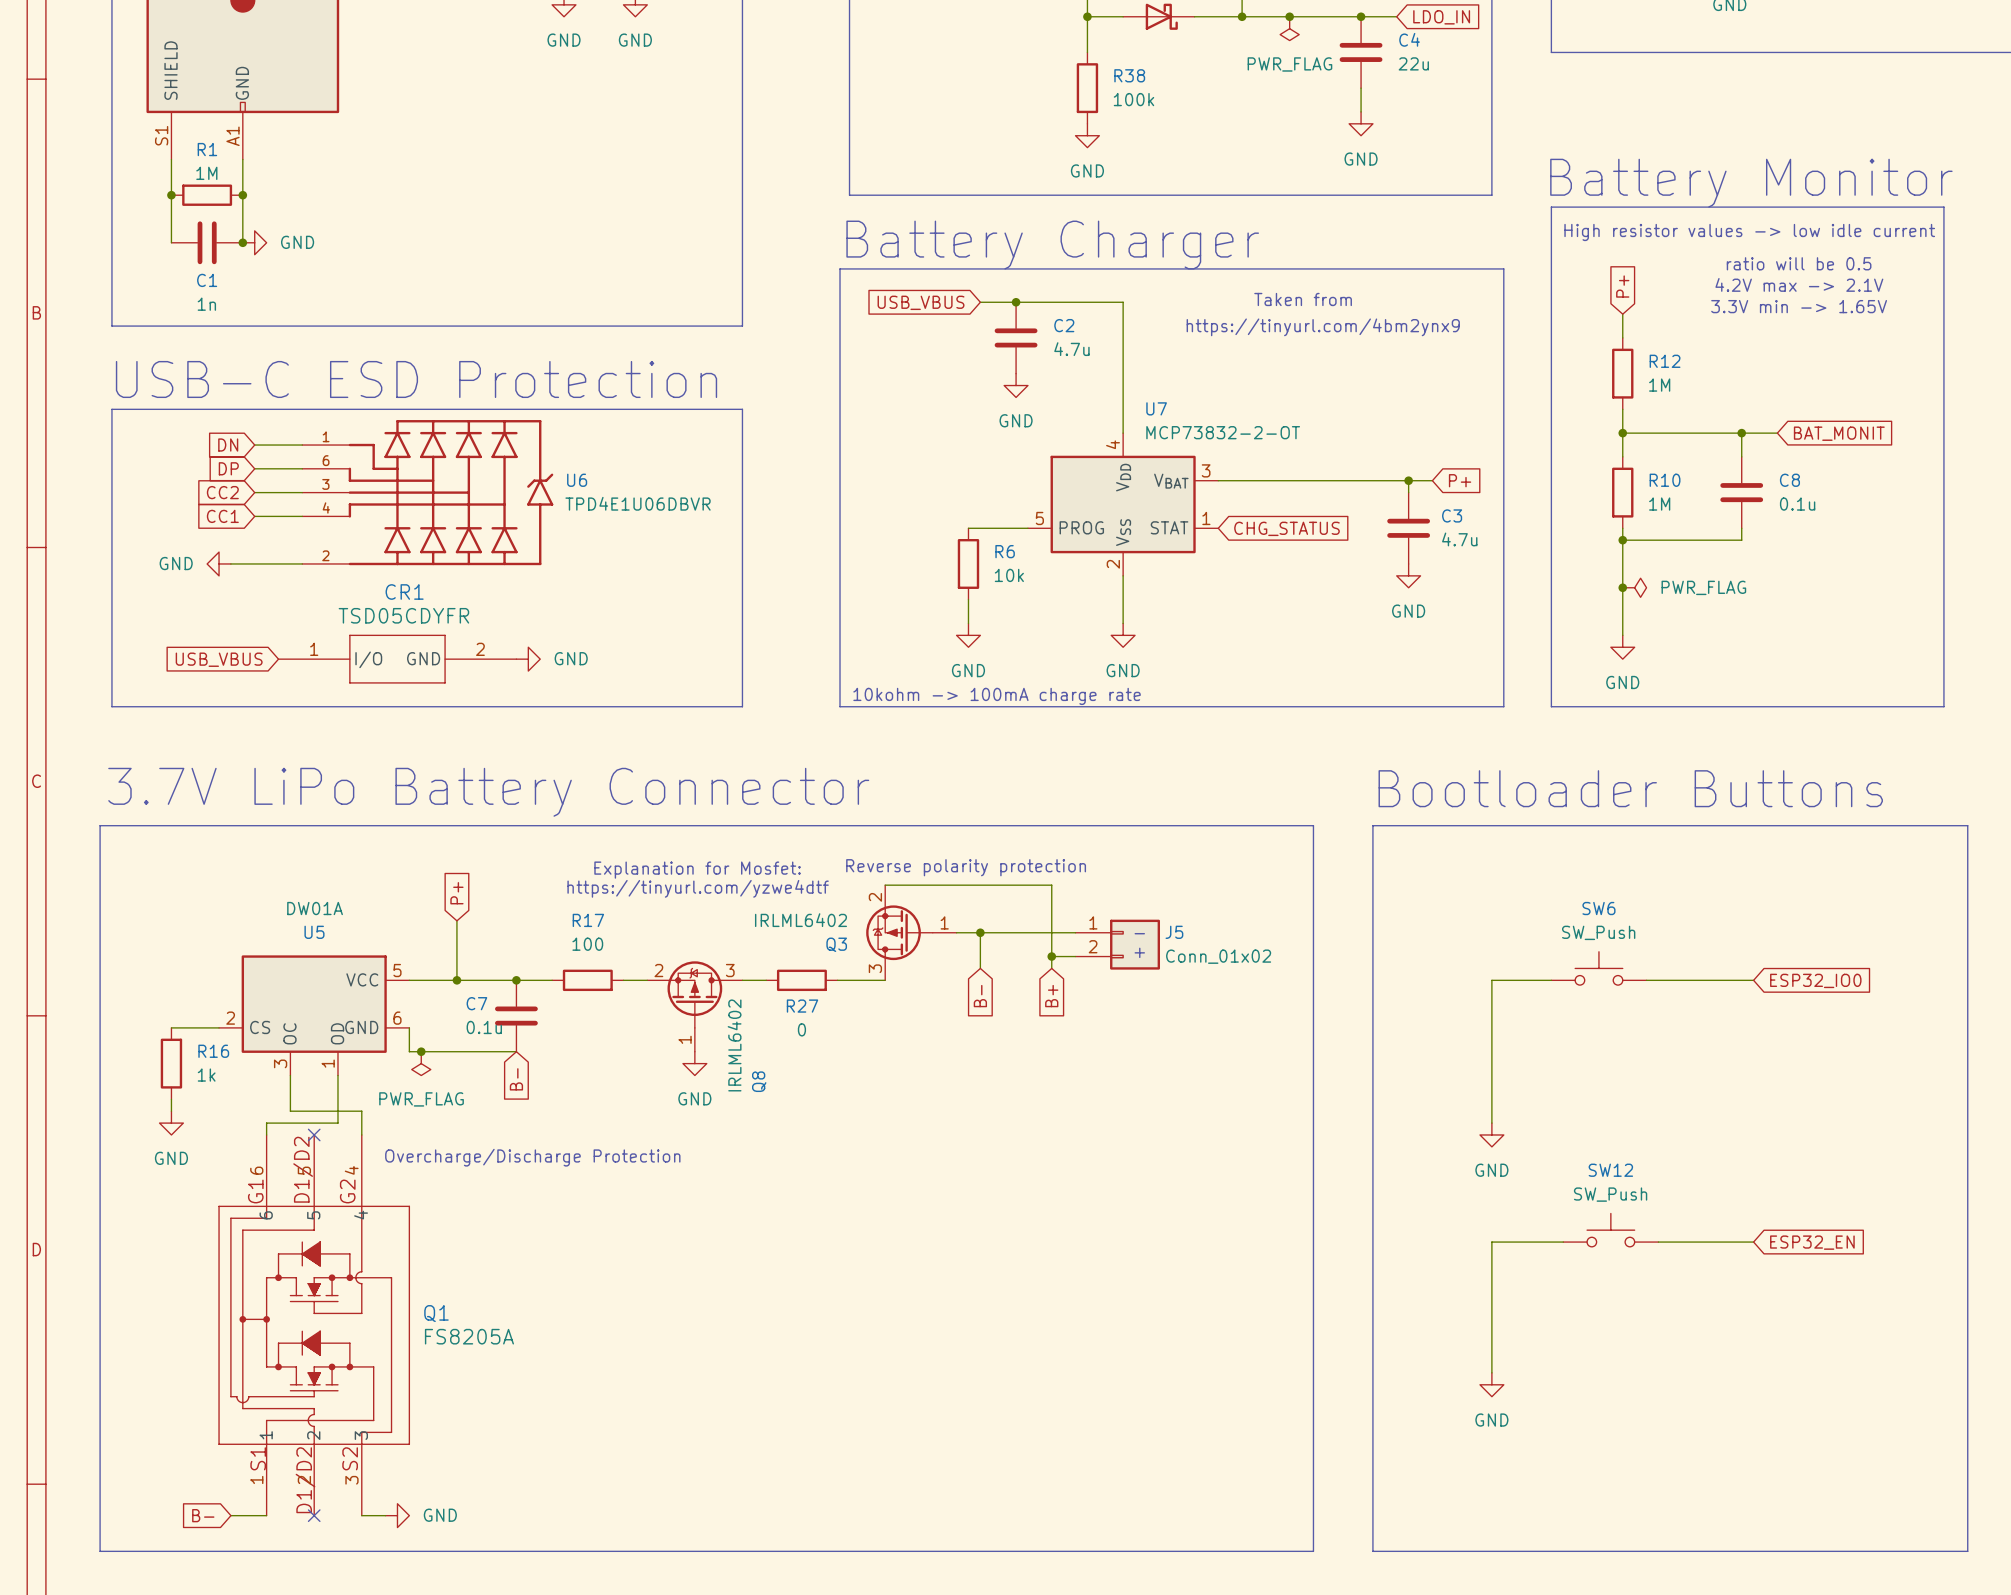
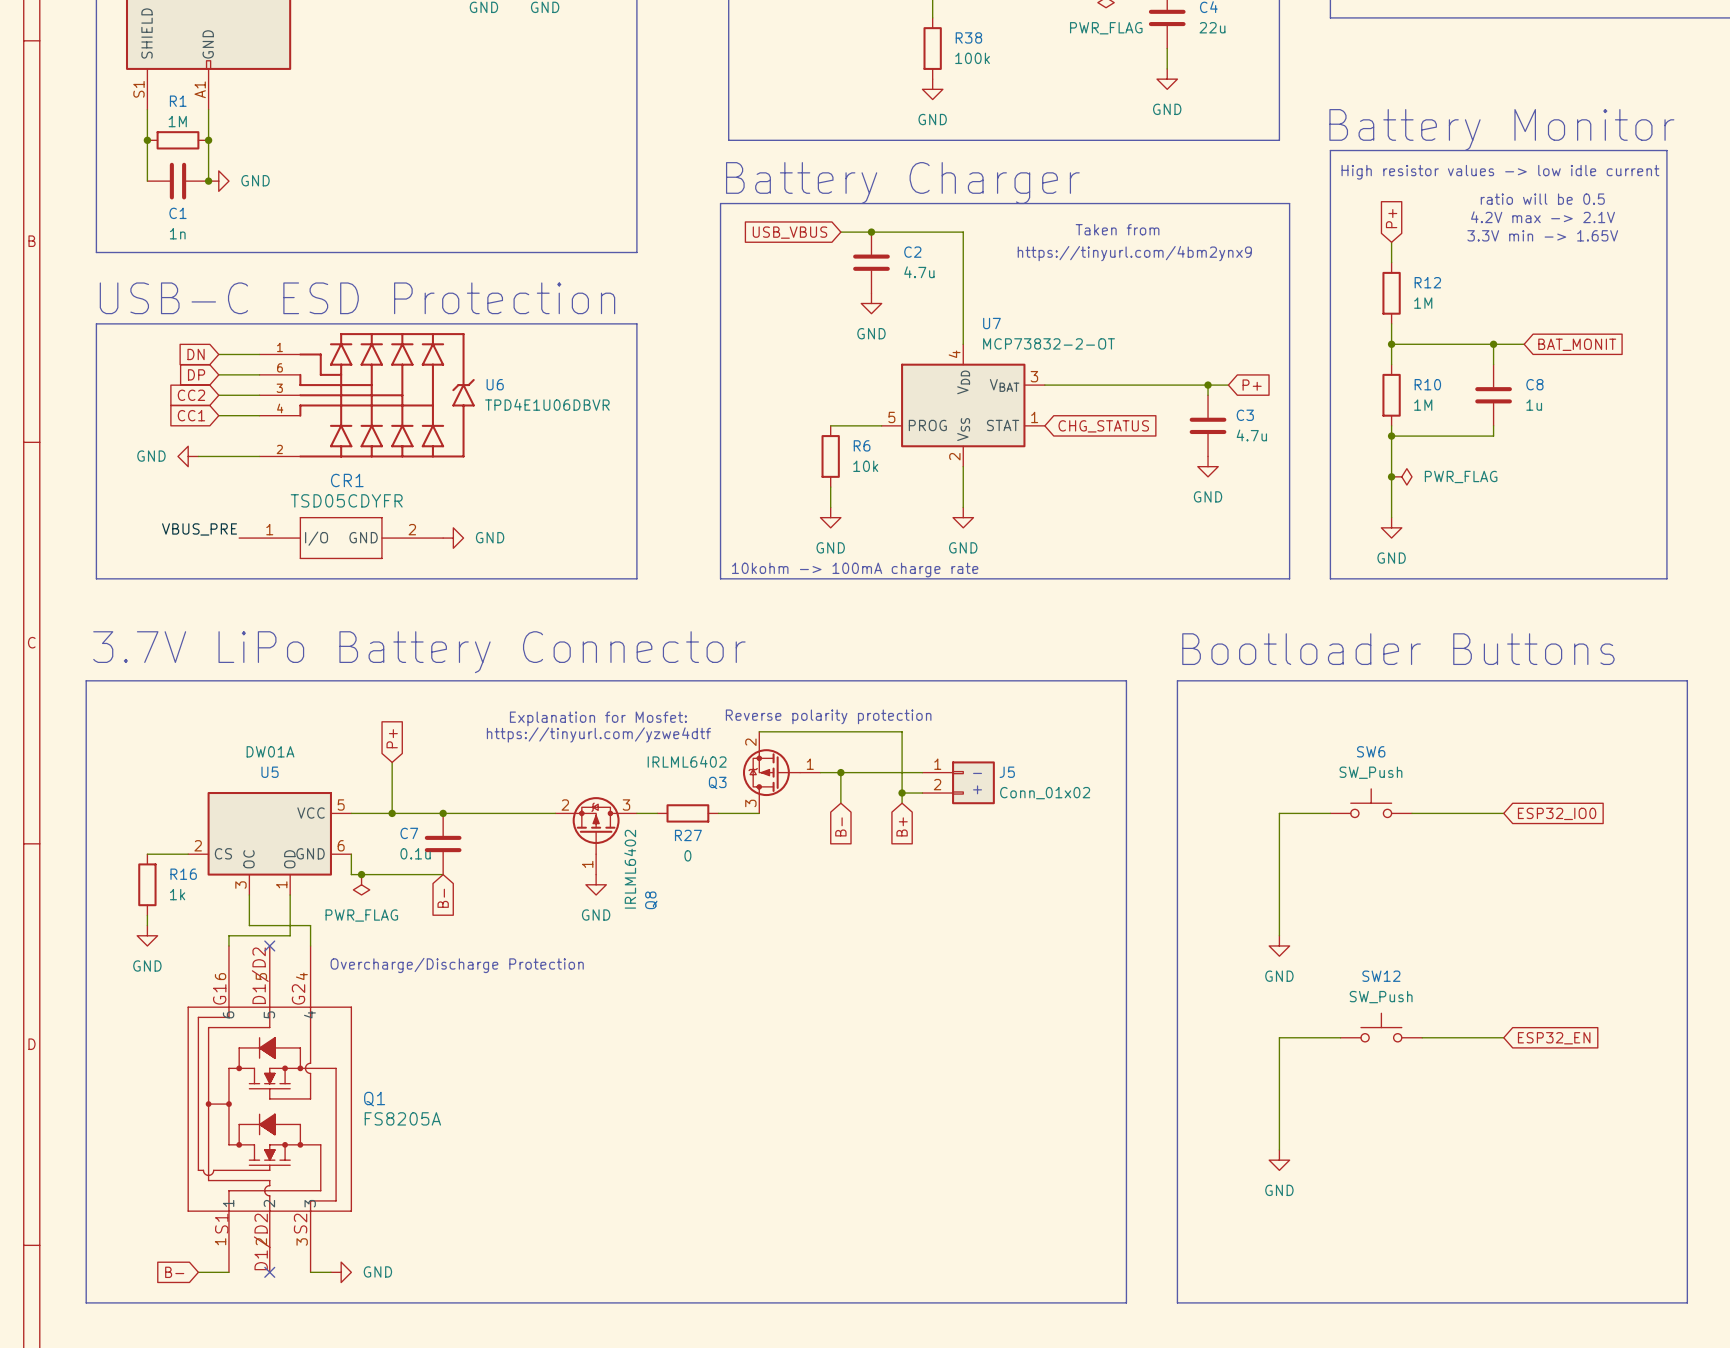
C8 value: 0.1u (1797, 504) -> 1u (1534, 405)
label: none -> VBUS_PRE (199, 529)
global label: USB_VBUS (219, 659) -> none
wire: none -> (473, 813) (534, 813)
R17: 100 (587, 980) -> none

